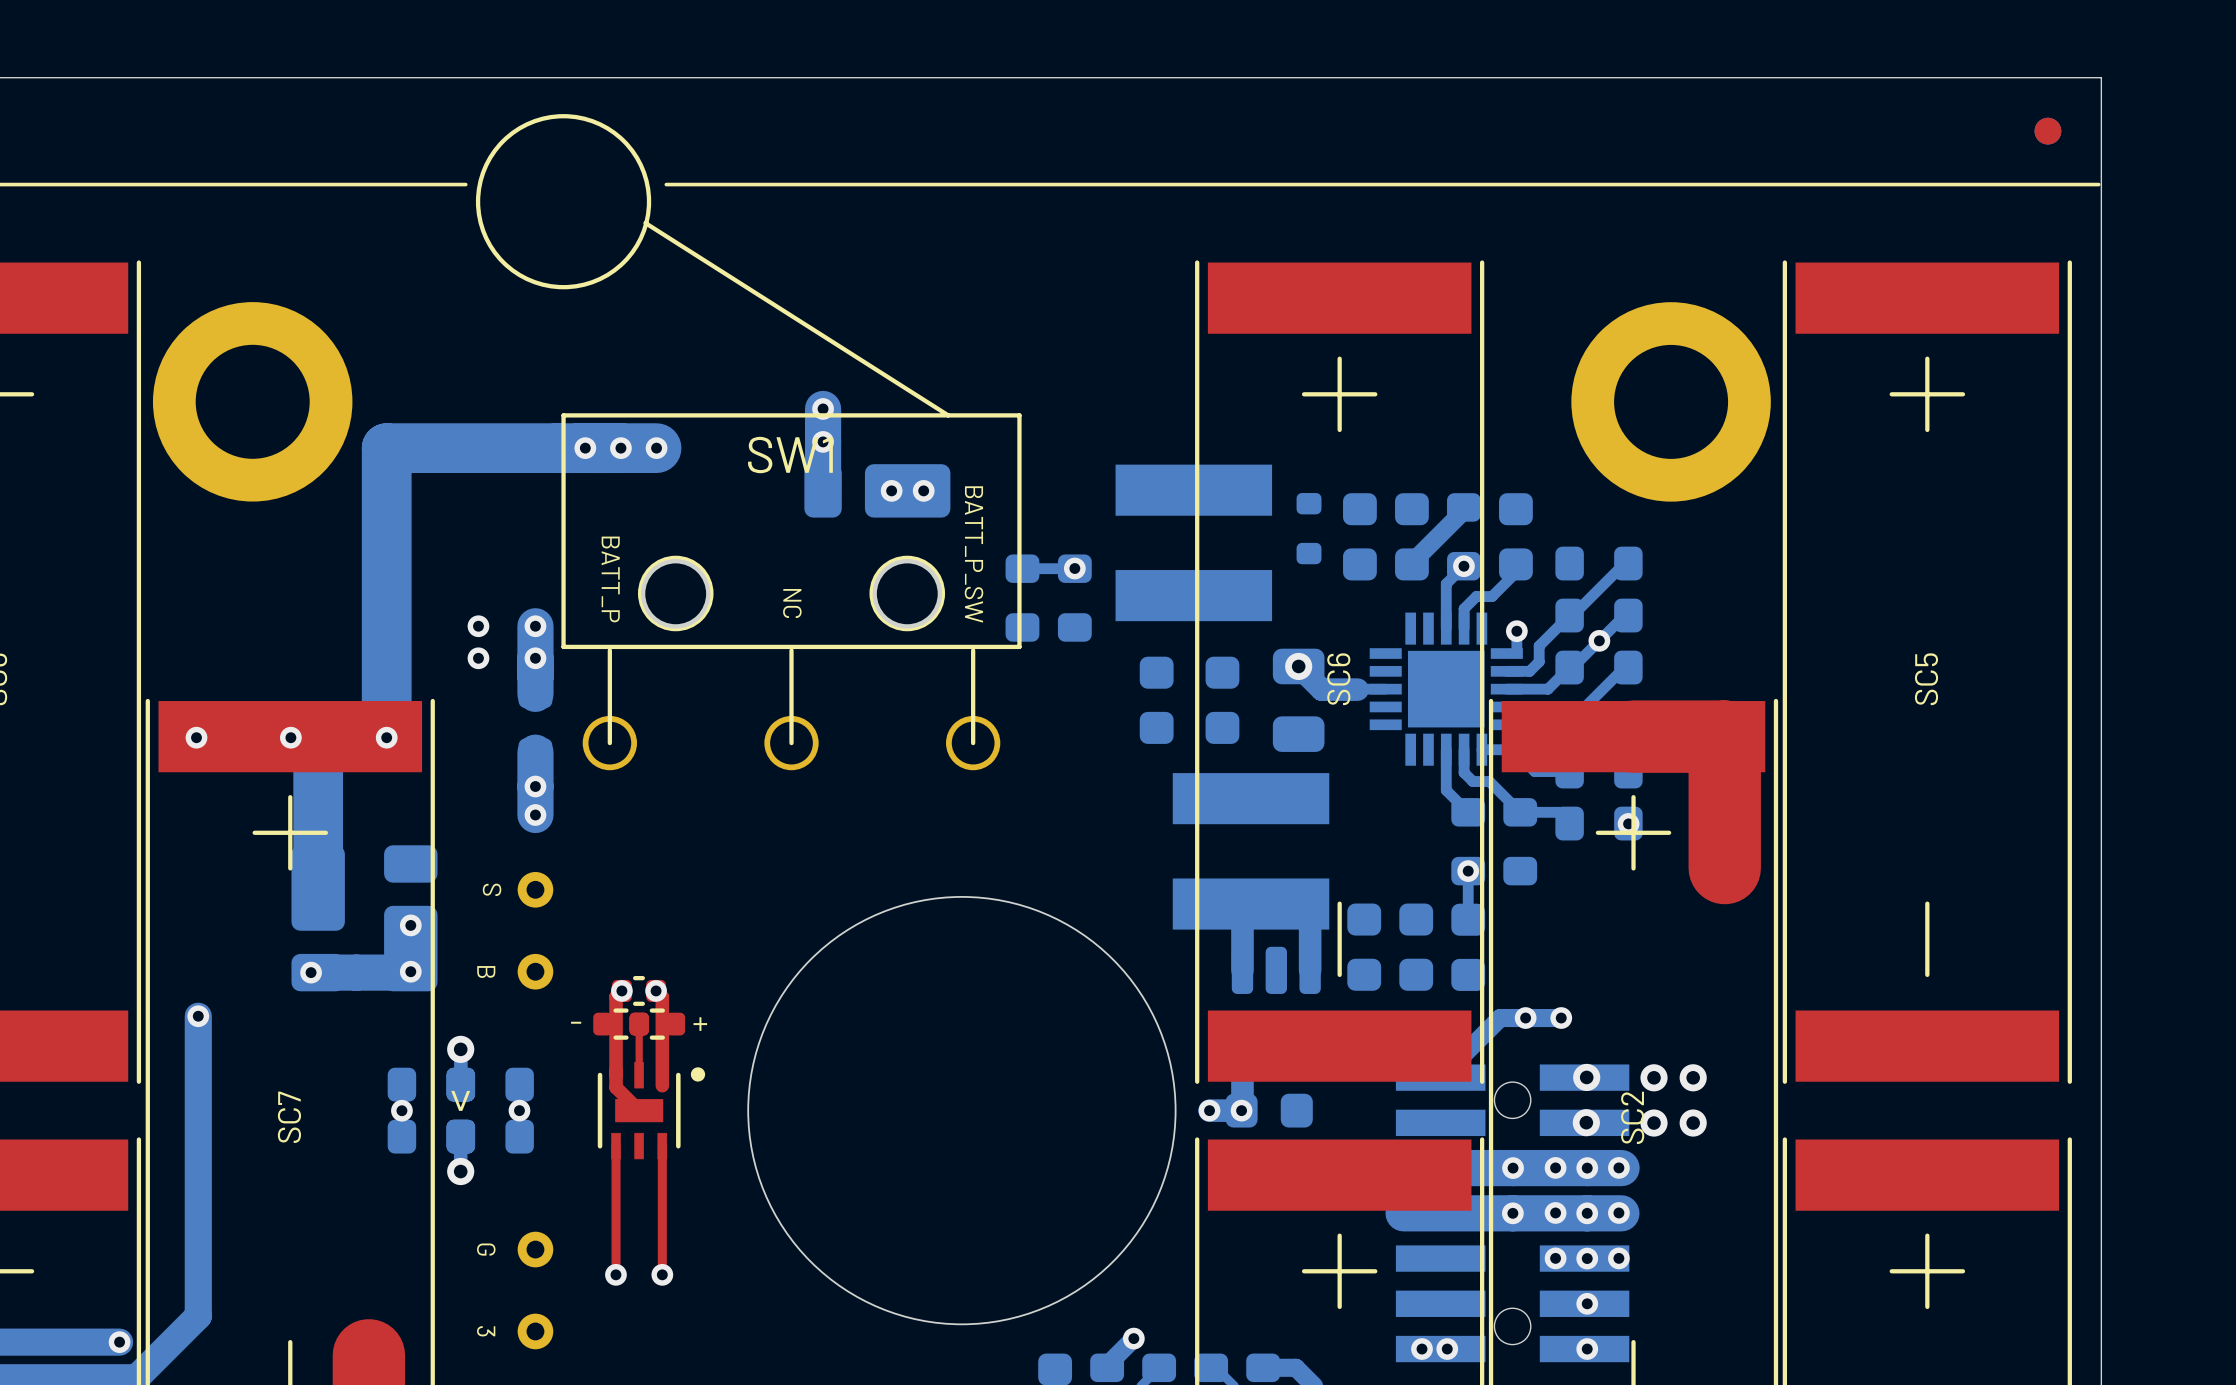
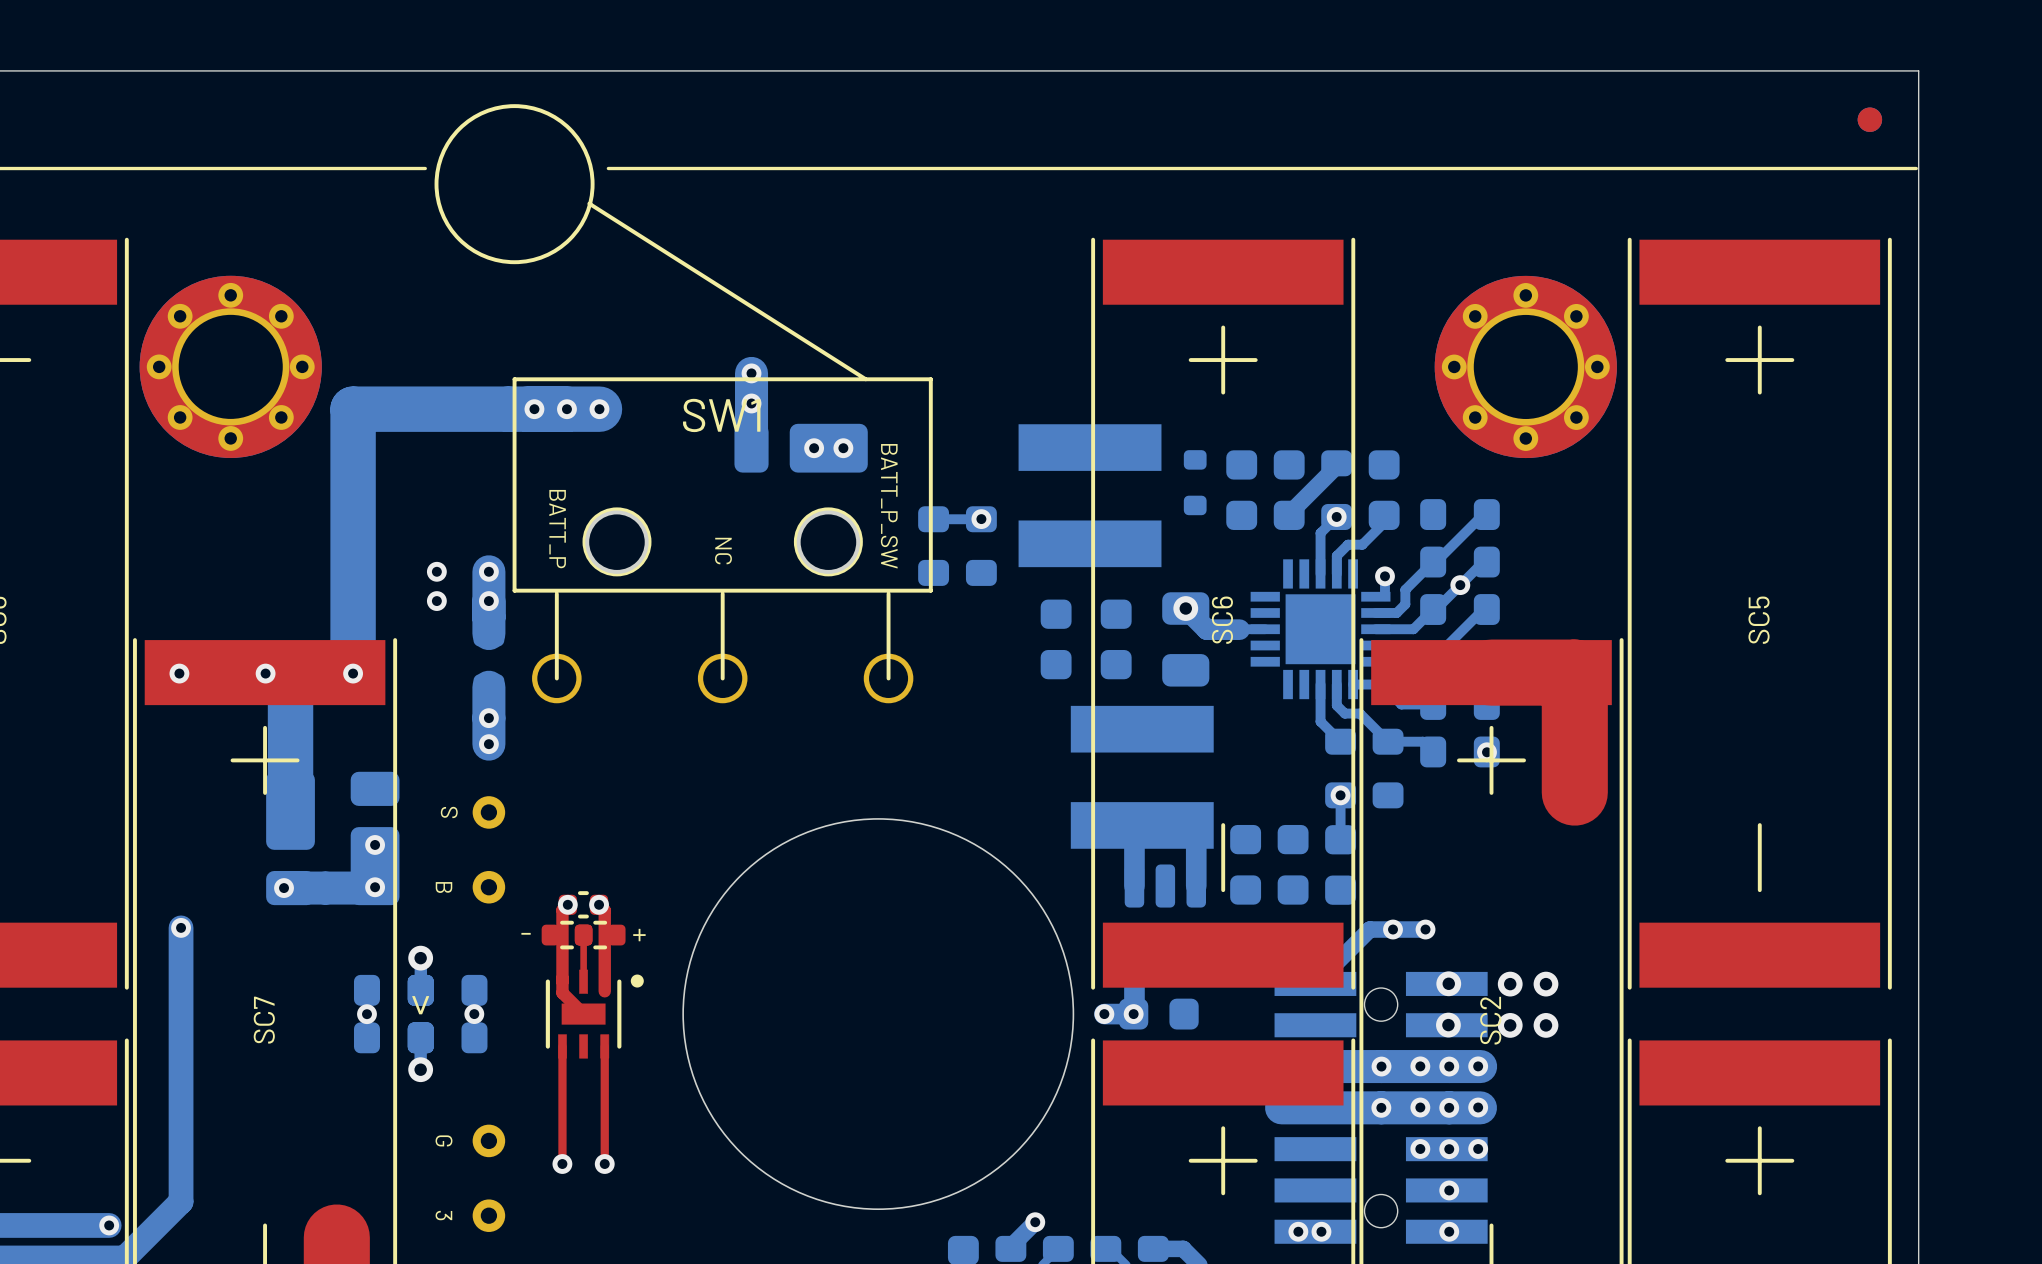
part footprint: [152, 302, 353, 502] -> [139, 275, 322, 458]
part footprint: [1571, 302, 1771, 502] -> [1434, 275, 1617, 459]

